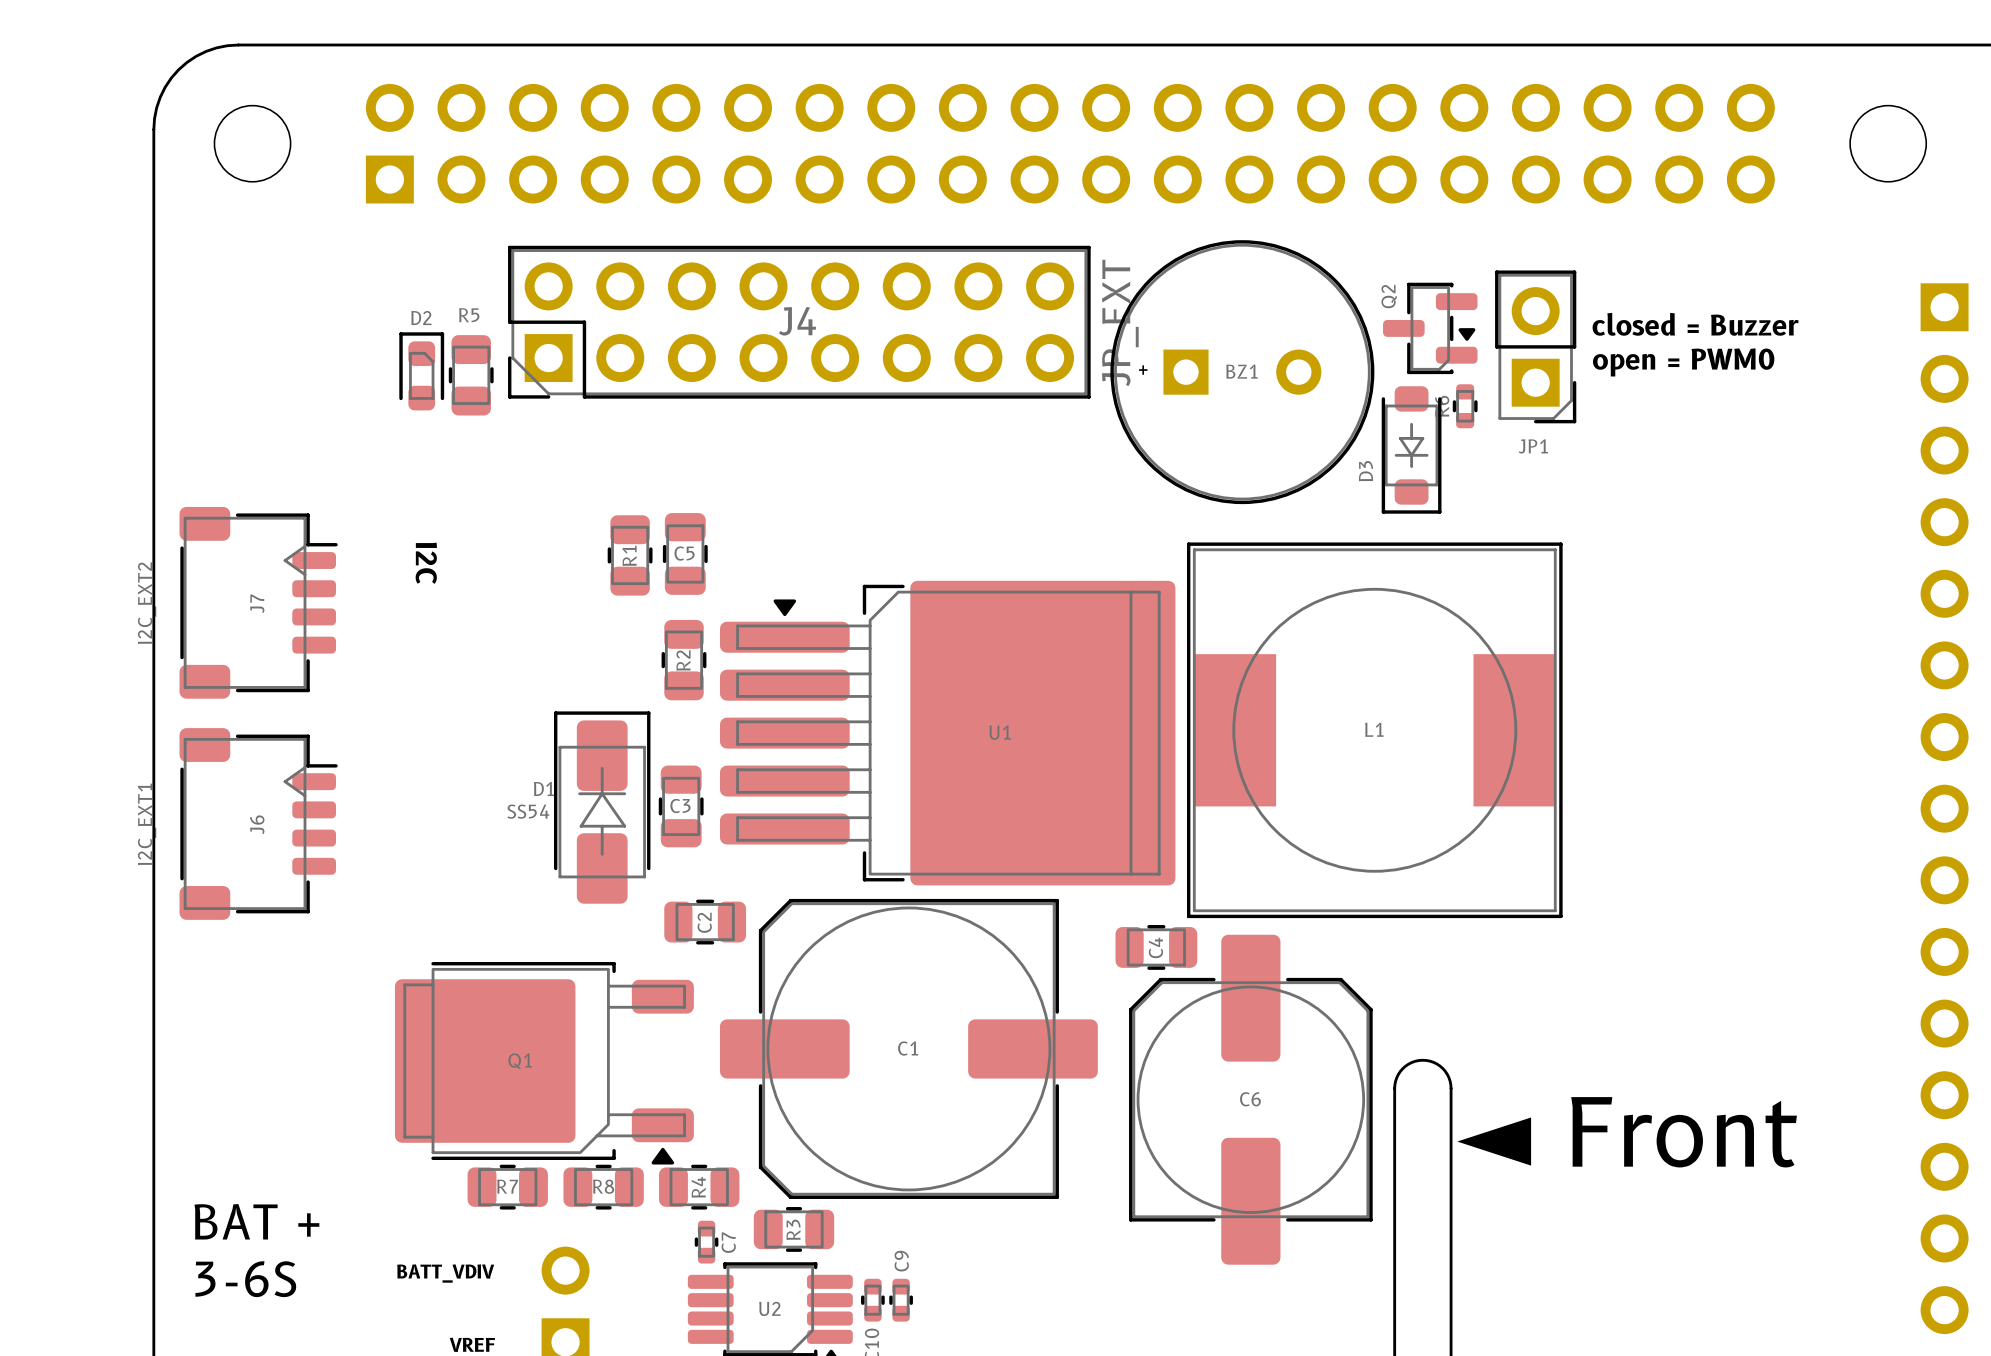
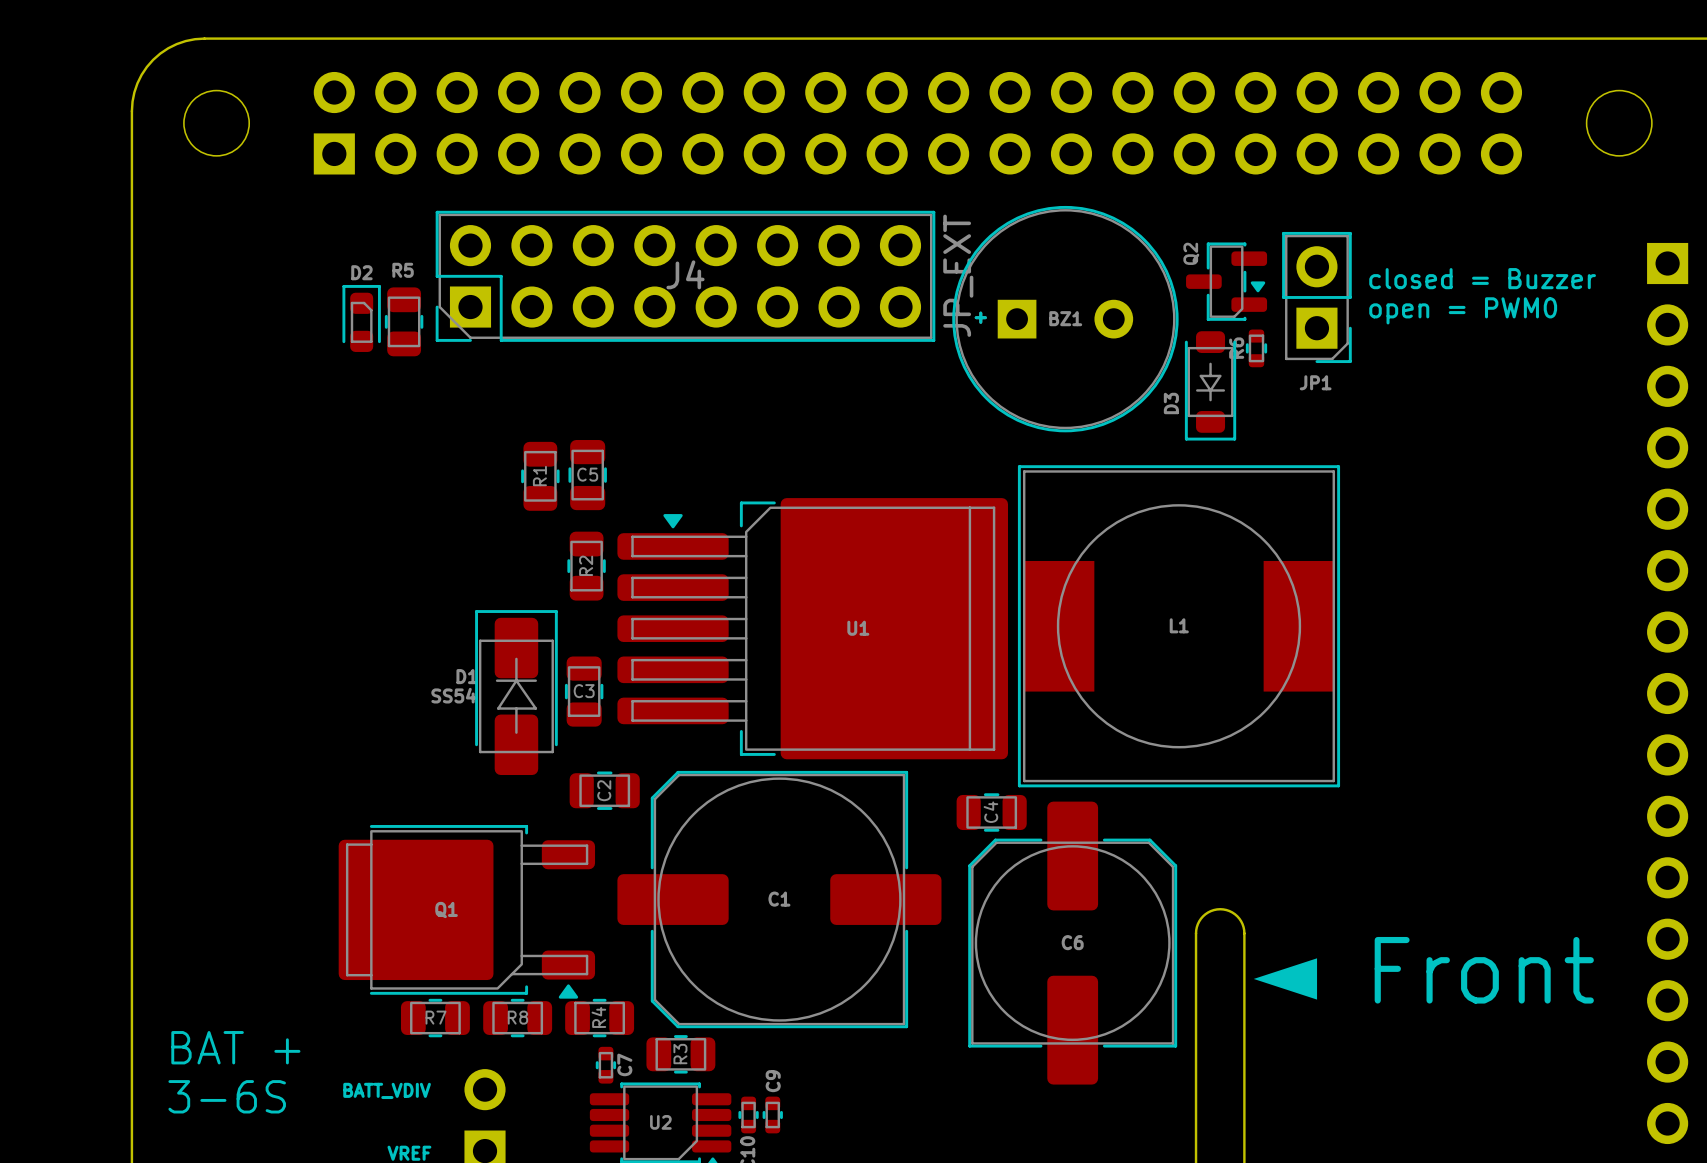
text: I2C (426, 563) -> none
J7: I2C_EXT2 (258, 602) -> none
J6: I2C_EXT1 (258, 823) -> none

